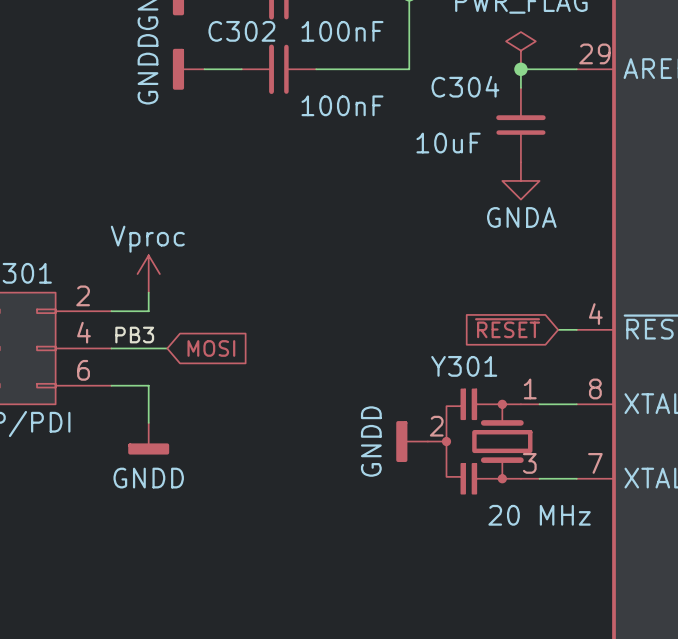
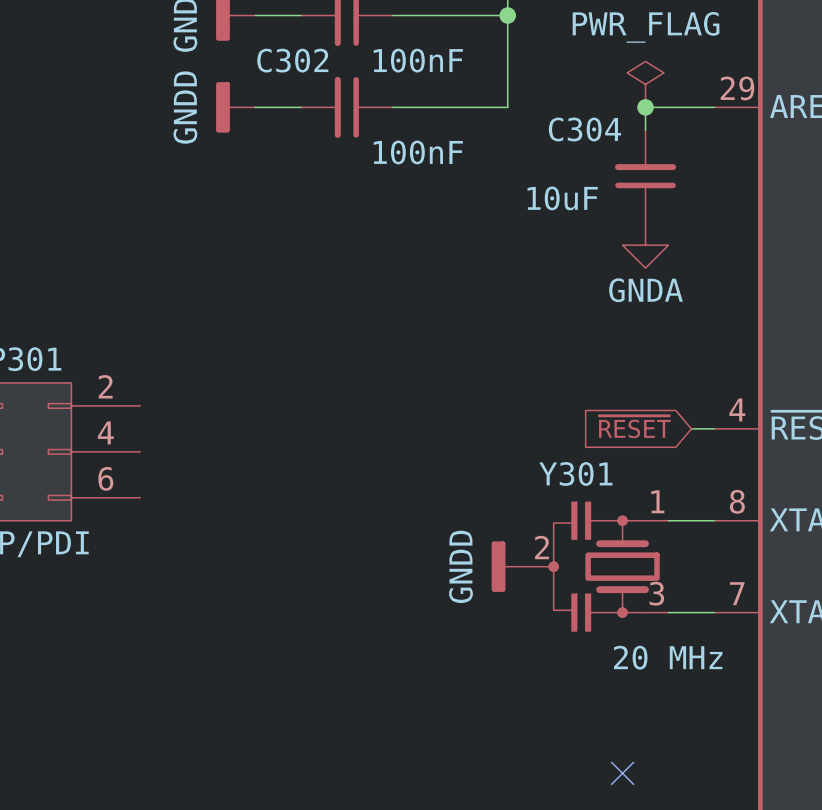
power symbol: Vproc (148, 274) -> none
wire: (148, 292) (148, 311) (111, 311) -> none
label: PB3 (134, 335) -> none
wire: (111, 348) (167, 348) -> none
global label: MOSI (211, 348) -> none
wire: (111, 385) (148, 385) (148, 422) -> none
power symbol: GNDD (148, 438) -> none
no-connect mark: none -> (622, 773)

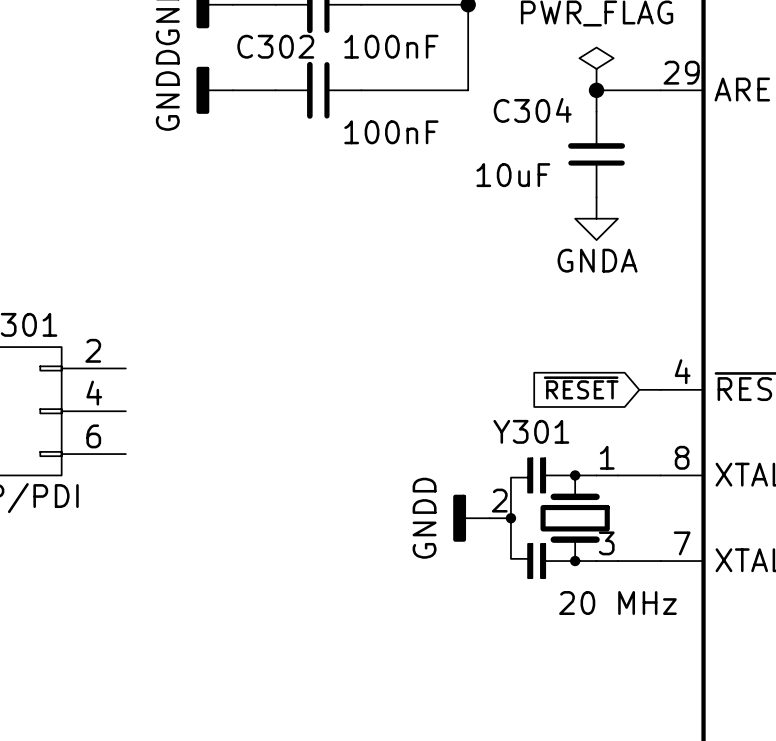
no-connect mark: (622, 773) -> none

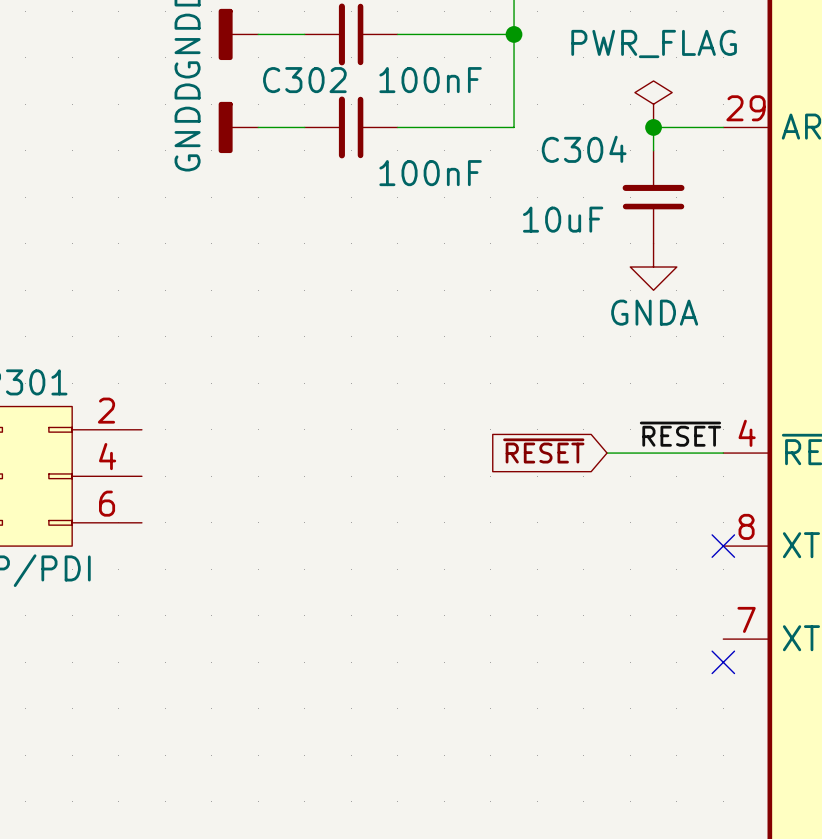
label: none -> ~{RESET} (680, 434)
global label position: ~{RESET} (581, 387) -> ~{RESET} (543, 450)
wire: none -> (607, 453) (700, 453)
wire: (617, 475) (660, 475) -> none
no-connect mark: none -> (723, 546)
power symbol: GNDD (471, 518) -> none
Y301: 20 MHz (553, 518) -> none
wire: (617, 561) (660, 561) -> none
no-connect mark: none -> (723, 662)

